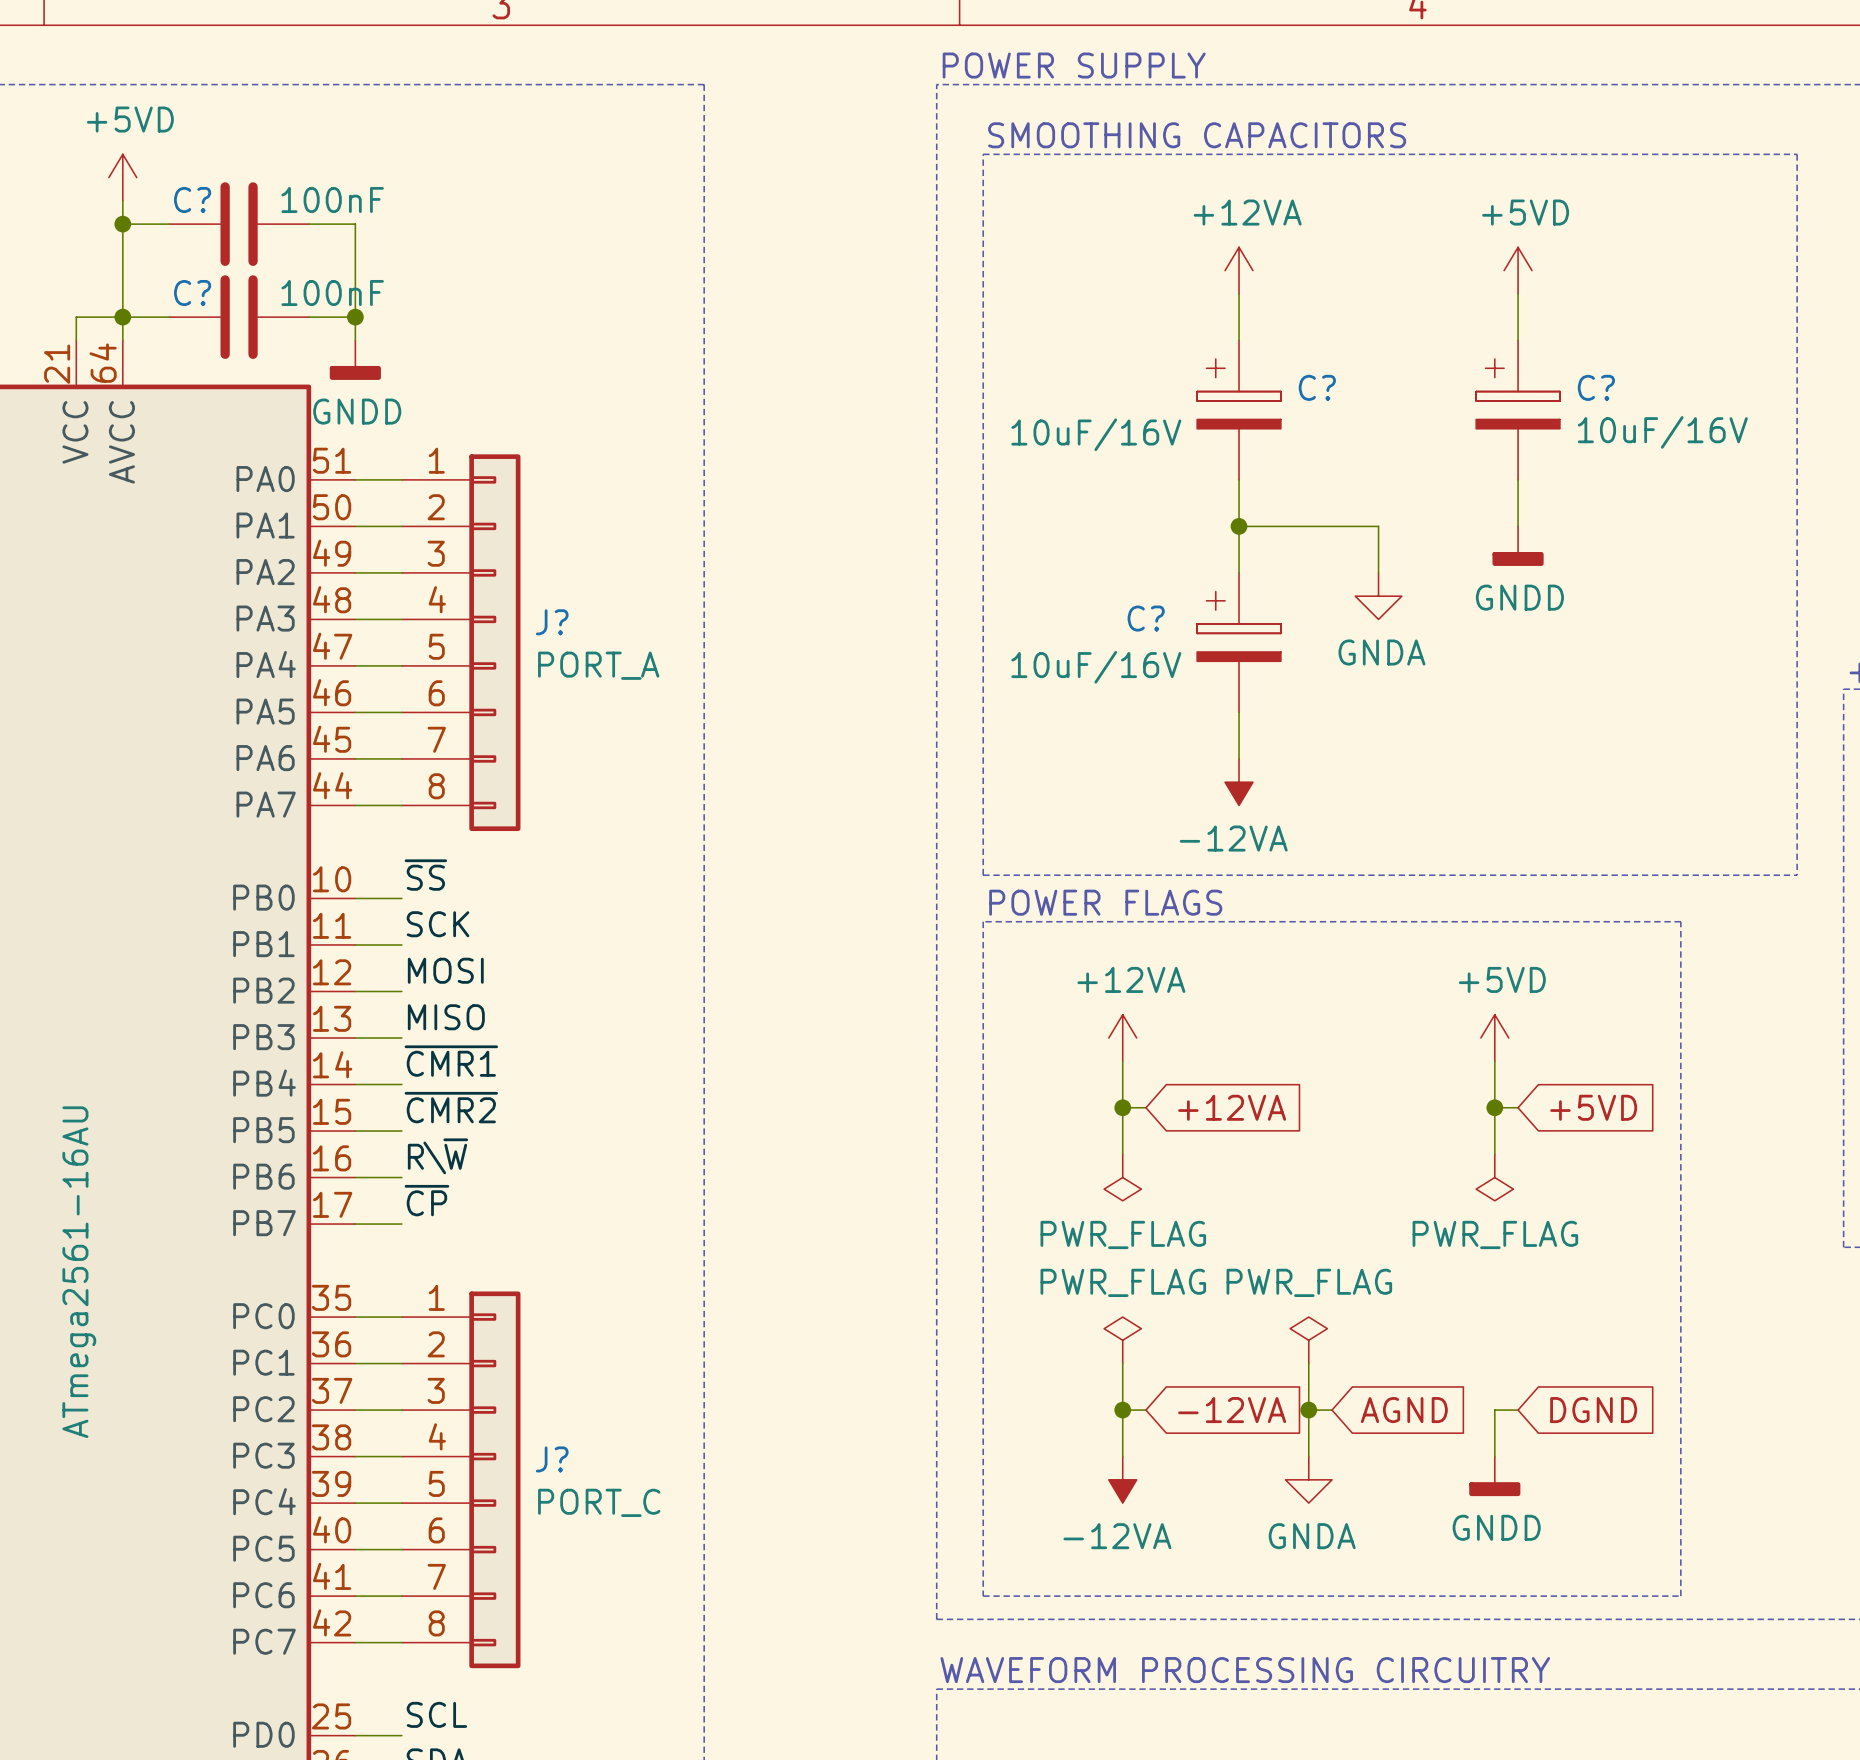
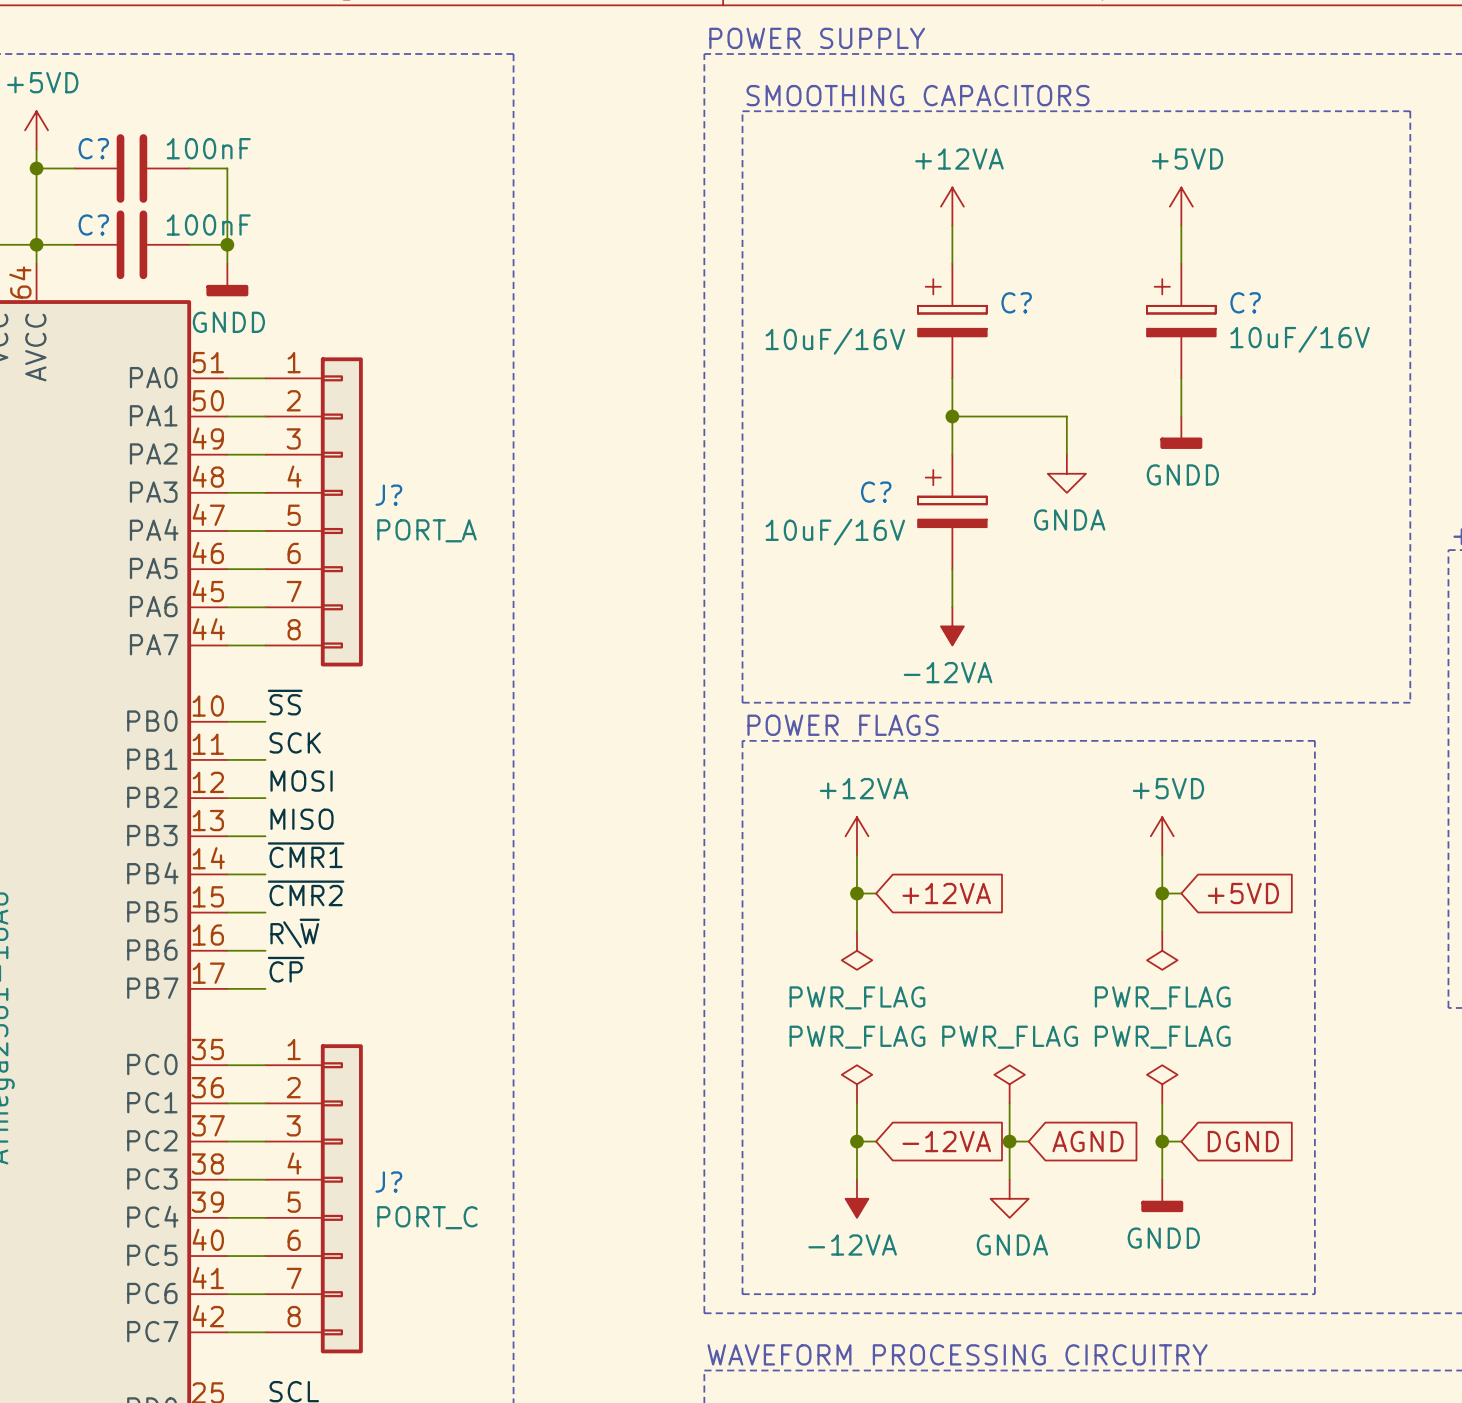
power symbol: none -> PWR_FLAG (1162, 1084)
wire: none -> (1162, 1103) (1162, 1141)
junction: none -> (1162, 1141)

